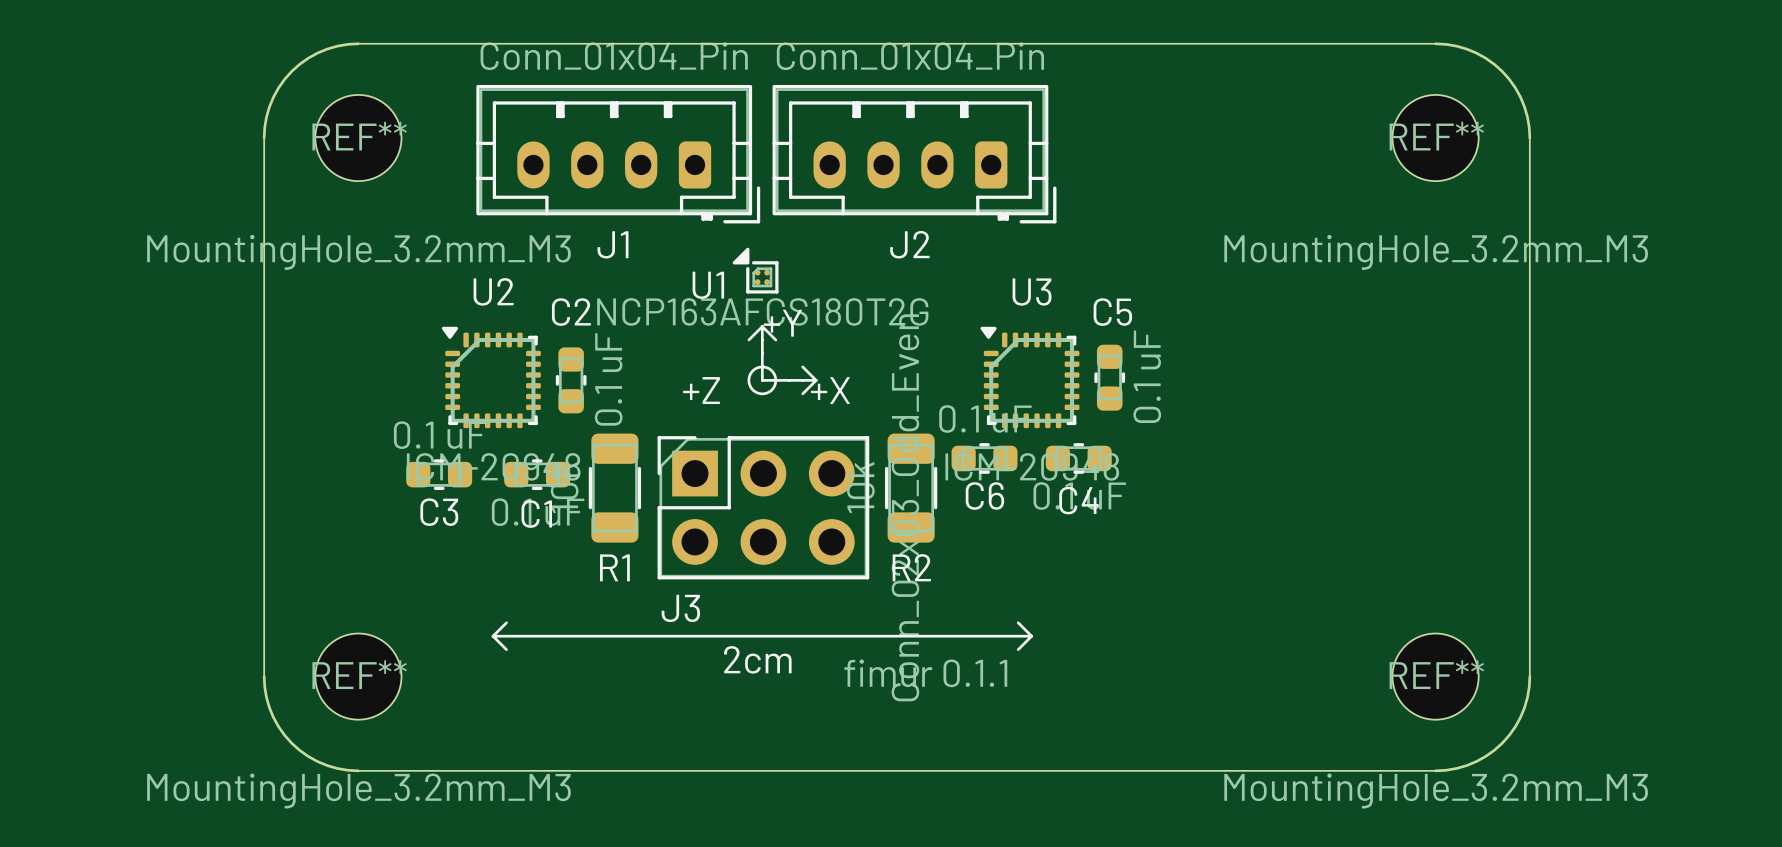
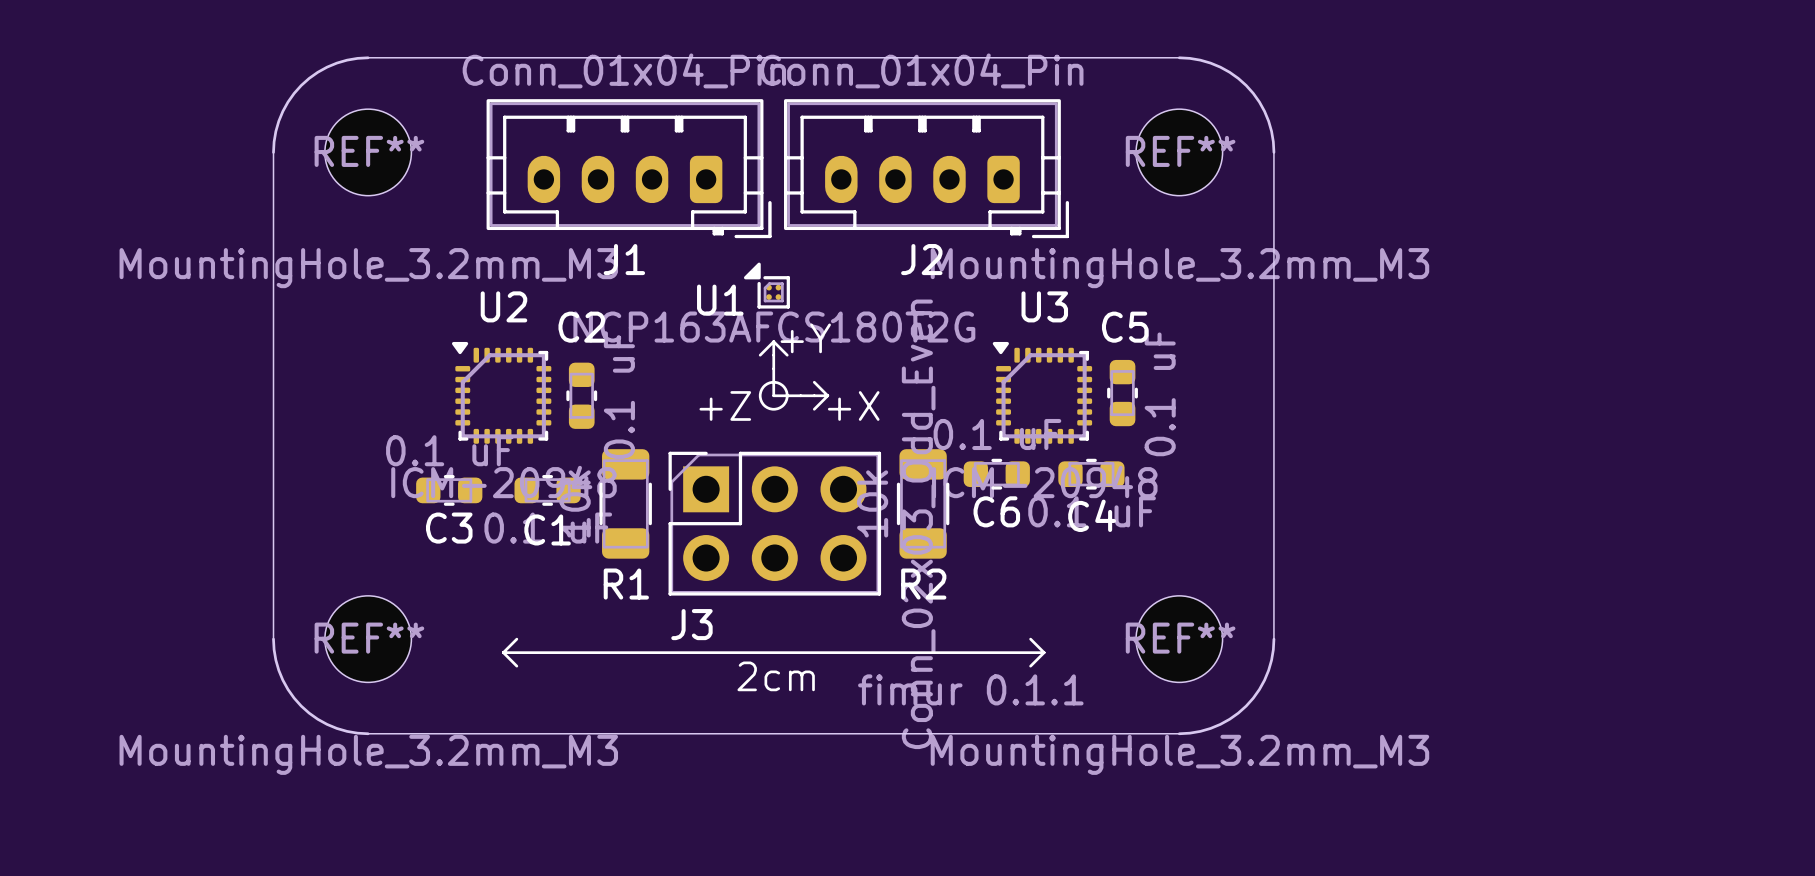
board edge: (1166, 43) (1446, 44) (1466, 49) (1485, 58) (1502, 71) (1520, 97) (1527, 117) (1529, 138) (1529, 676) (1524, 707) (1515, 726) (1502, 743) (1485, 756) (1466, 765) (1435, 770) (347, 770) (327, 765) (308, 756) (291, 743) (278, 726) (269, 707) (264, 687) (264, 622) -> (1179, 57) (1210, 63) (1229, 72) (1246, 85) (1264, 111) (1273, 141) (1273, 649) (1268, 670) (1259, 689) (1246, 706) (1229, 719) (1210, 728) (1179, 733) (357, 733) (327, 724) (301, 706) (282, 680) (275, 660) (273, 639)
REF** position: (1435, 138) -> (1179, 152)
REF** position: (358, 676) -> (368, 639)
REF** position: (1435, 676) -> (1179, 639)

